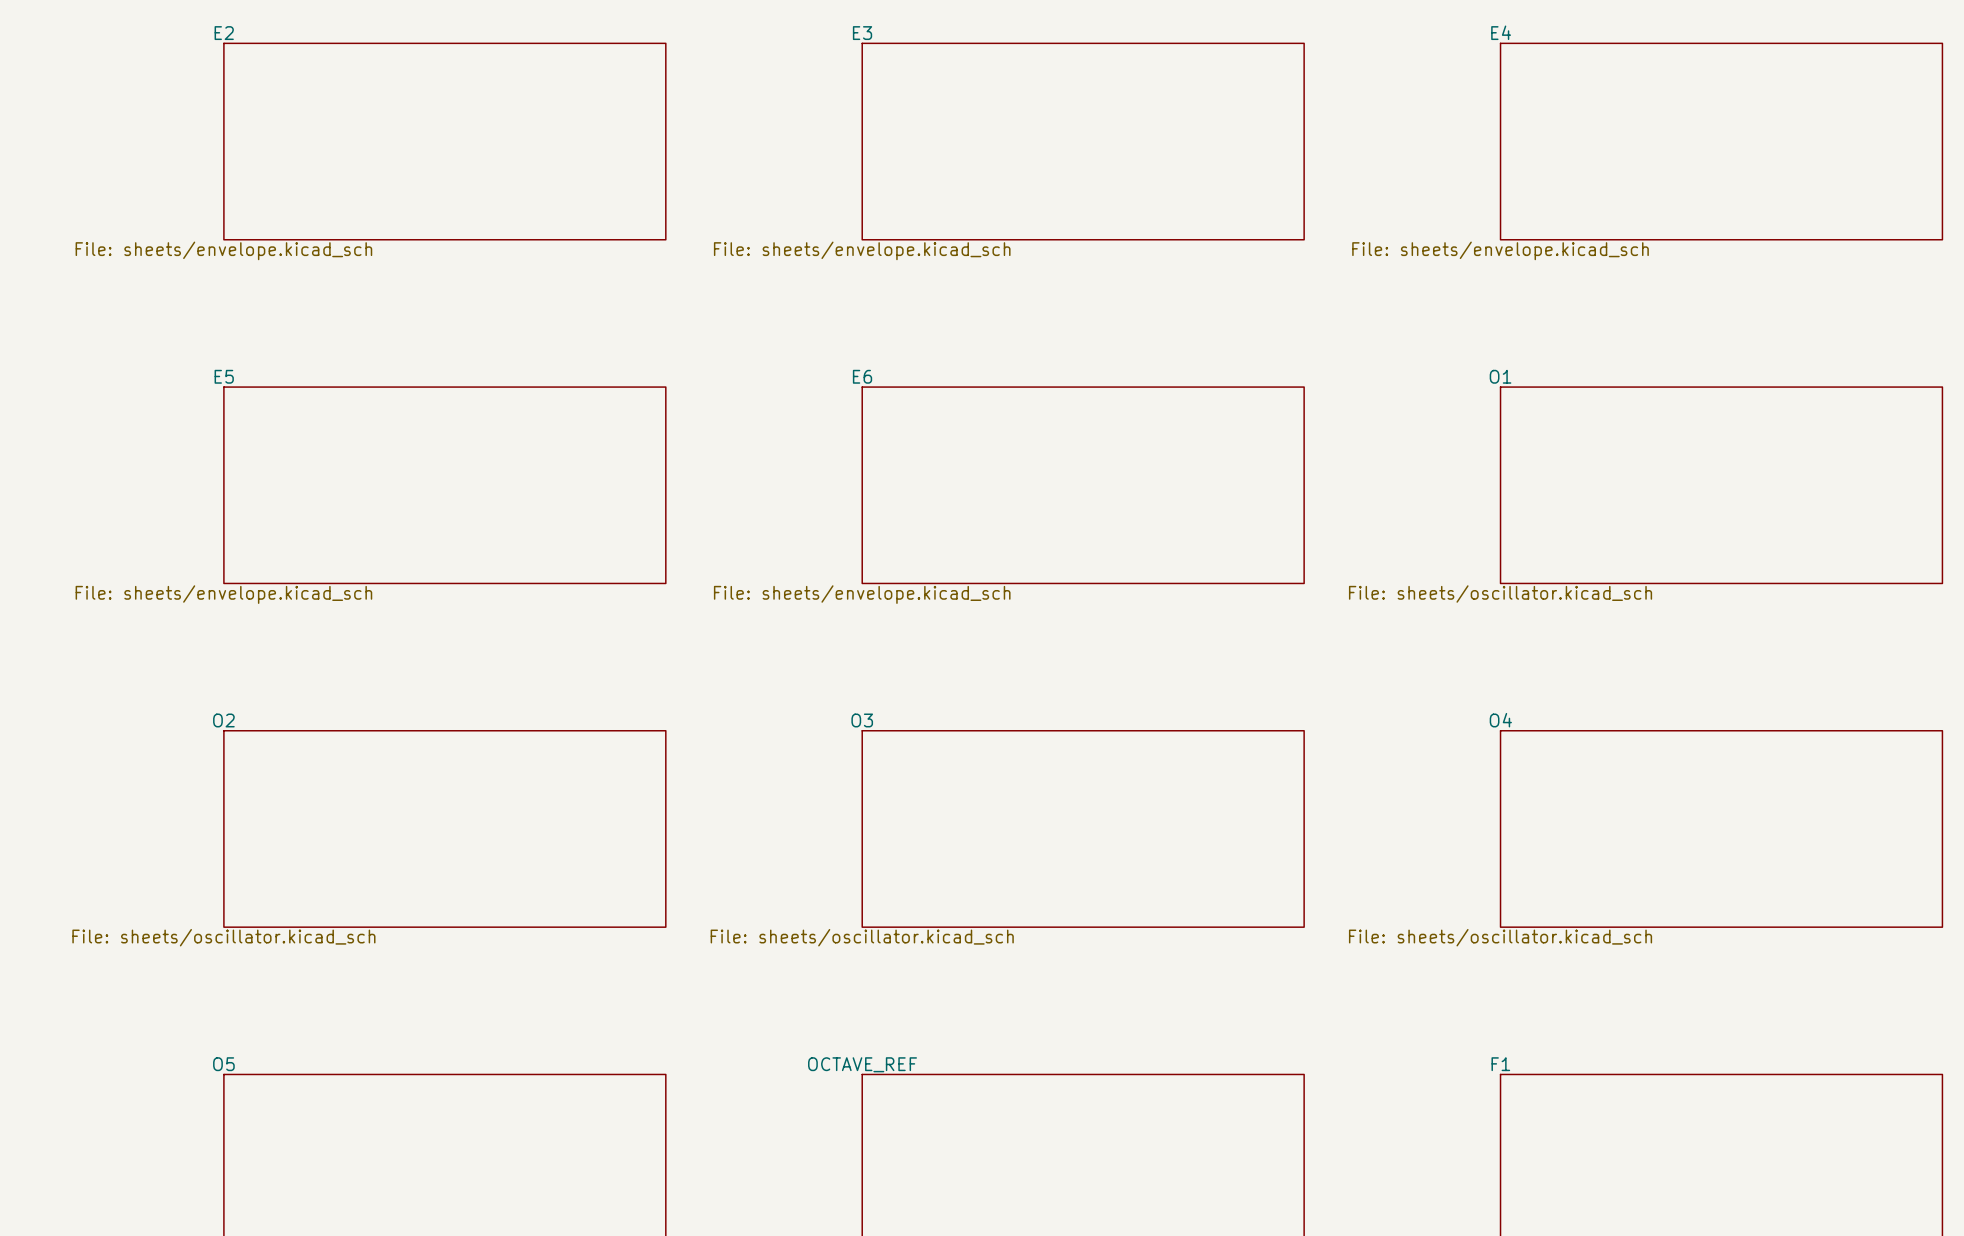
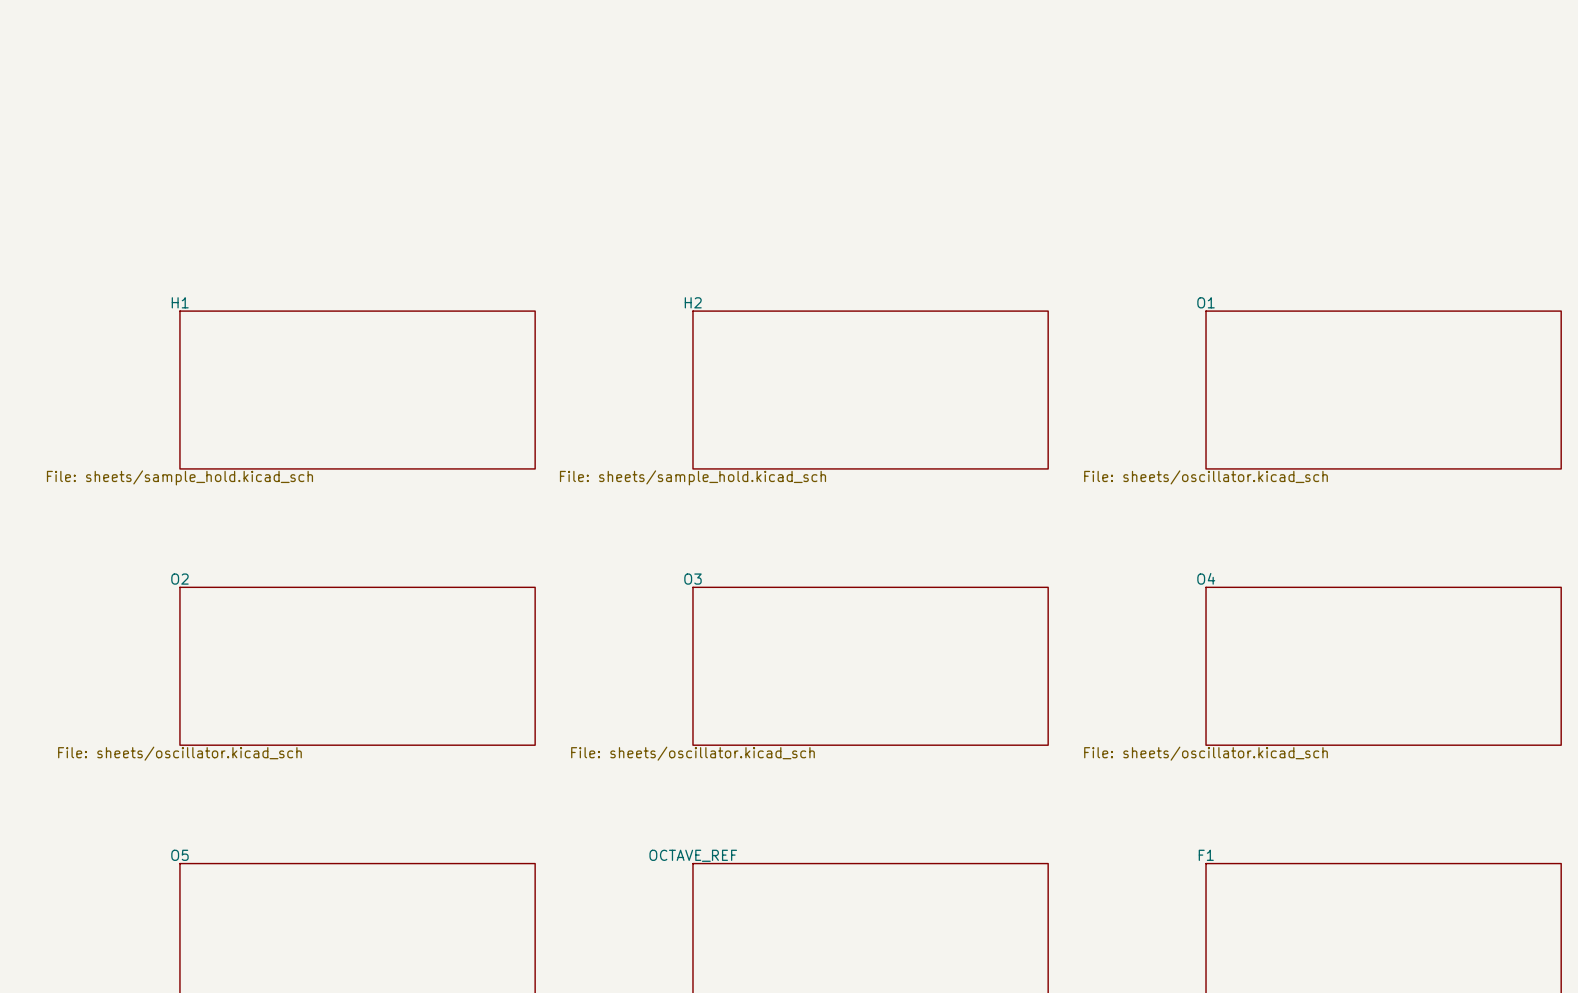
sheet E2: File: sheets/envelope.kicad_sch (444, 141) -> none
sheet E3: File: sheets/envelope.kicad_sch (1083, 141) -> none
sheet E4: File: sheets/envelope.kicad_sch (1721, 141) -> none
sheet E5 name: E5 (224, 376) -> H1 (180, 302)
sheet E6 name: E6 (862, 376) -> H2 (693, 302)
sheet E5 value: File: sheets/envelope.kicad_sch (223, 594) -> File: sheets/sample_hold.kicad_sch (179, 477)
sheet E6 value: File: sheets/envelope.kicad_sch (862, 594) -> File: sheets/sample_hold.kicad_sch (692, 477)

